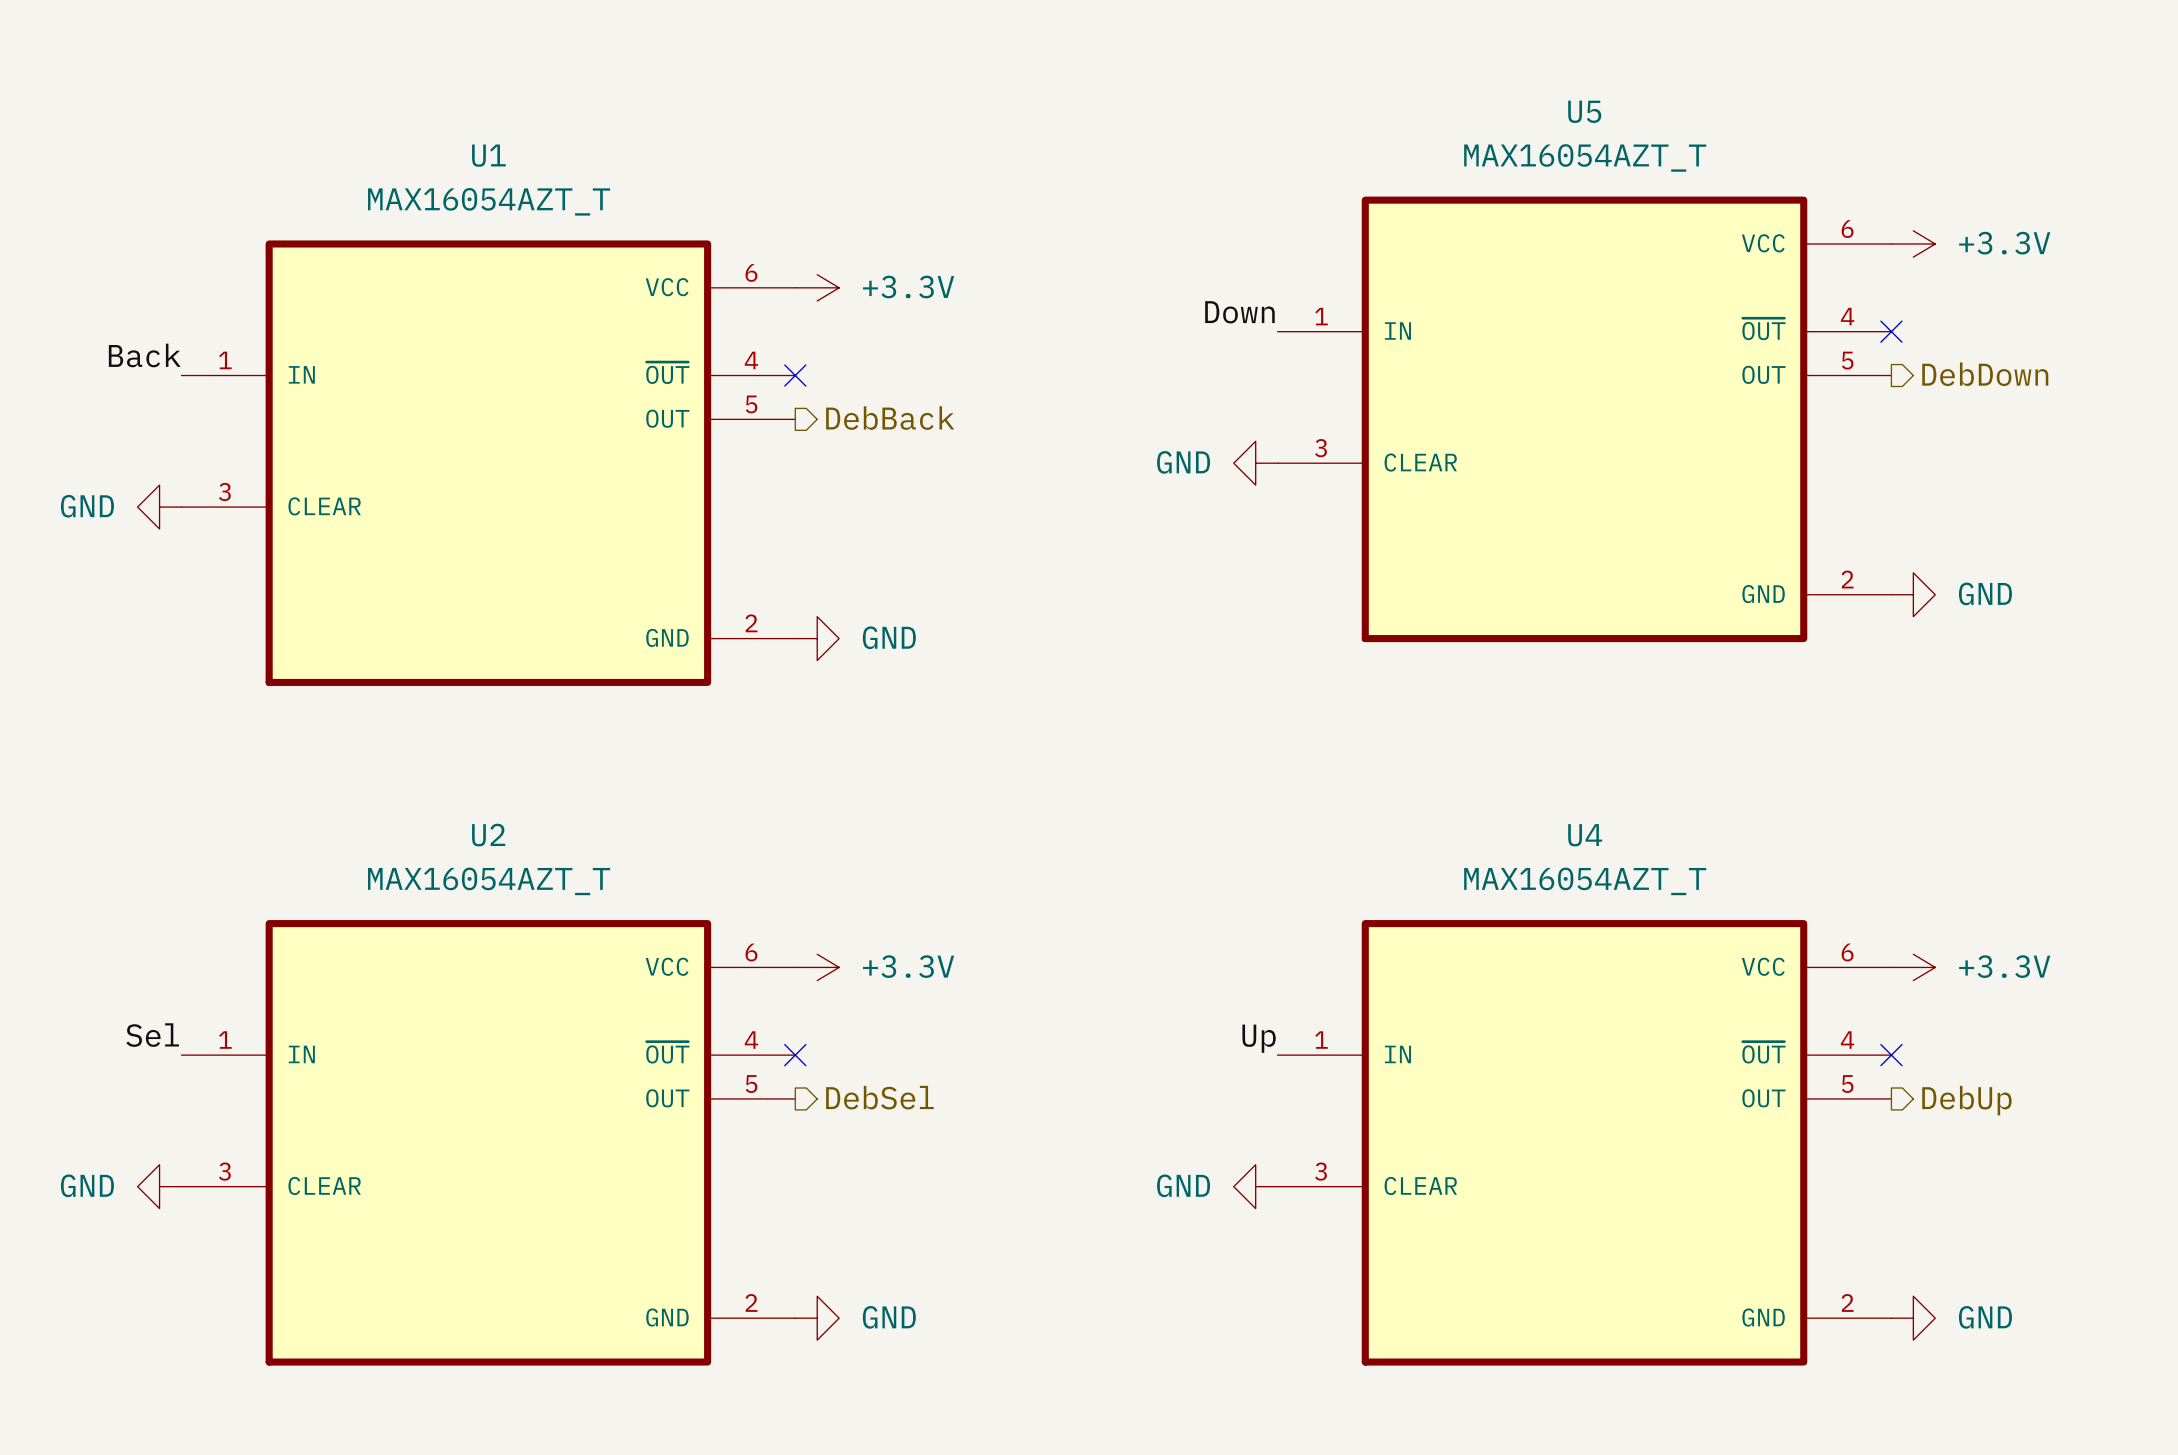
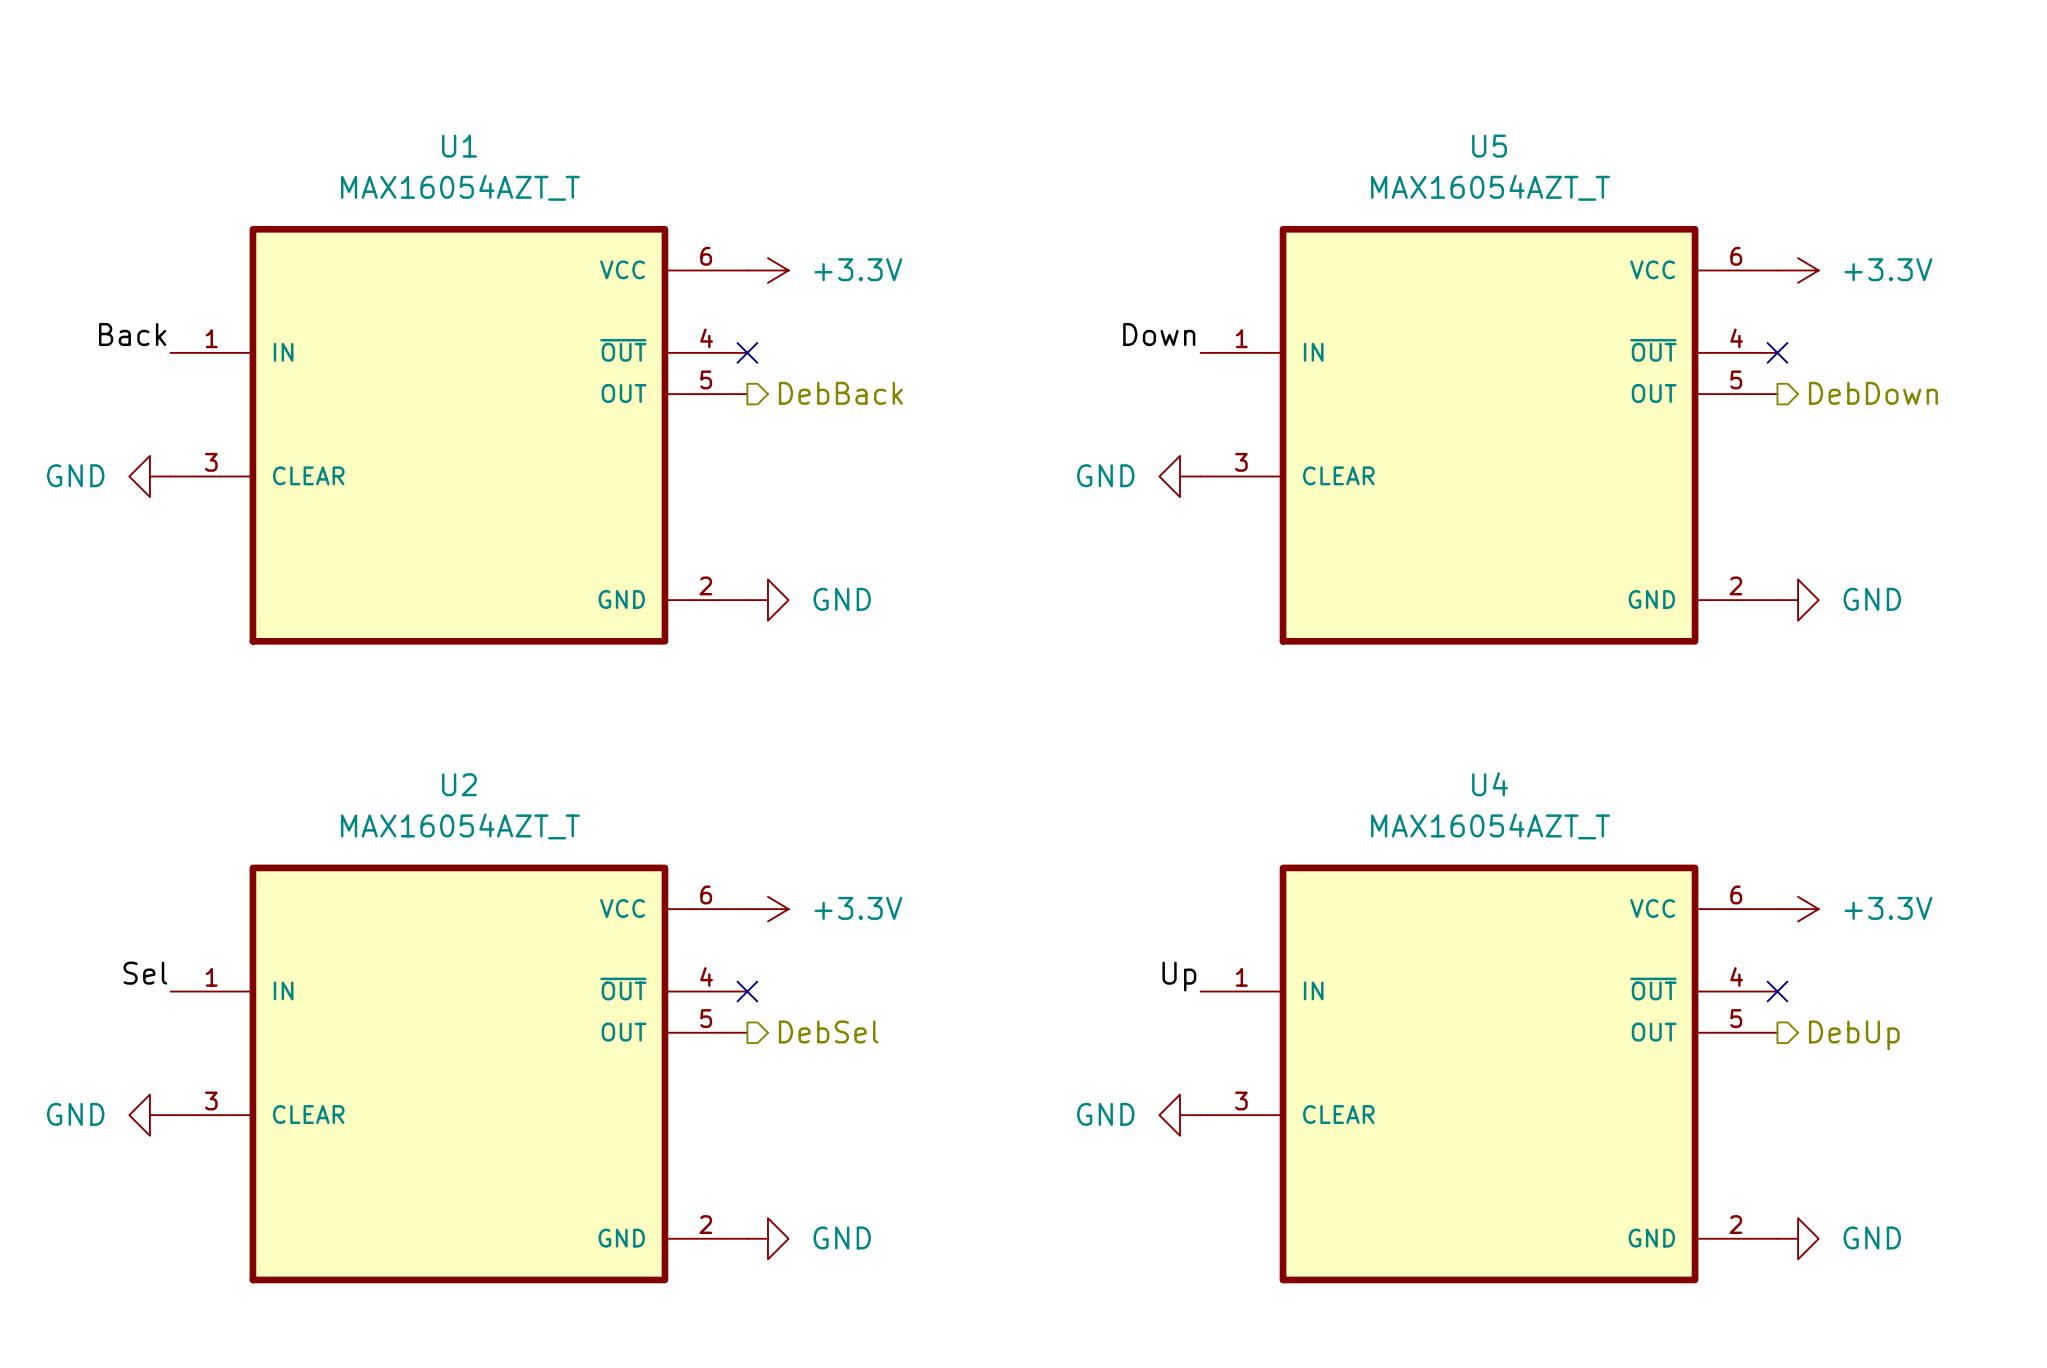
power symbol position: +3.3V (1913, 243) -> +3.3V (1798, 270)
label position: Down (1239, 312) -> Down (1159, 334)
no-connect mark position: (1891, 331) -> (1777, 352)
hierarchical label position: DebDown (1985, 374) -> DebDown (1873, 393)
U5 position: (1584, 419) -> (1489, 435)
power symbol position: GND (1255, 463) -> GND (1180, 476)
power symbol position: GND (1913, 594) -> GND (1798, 600)

